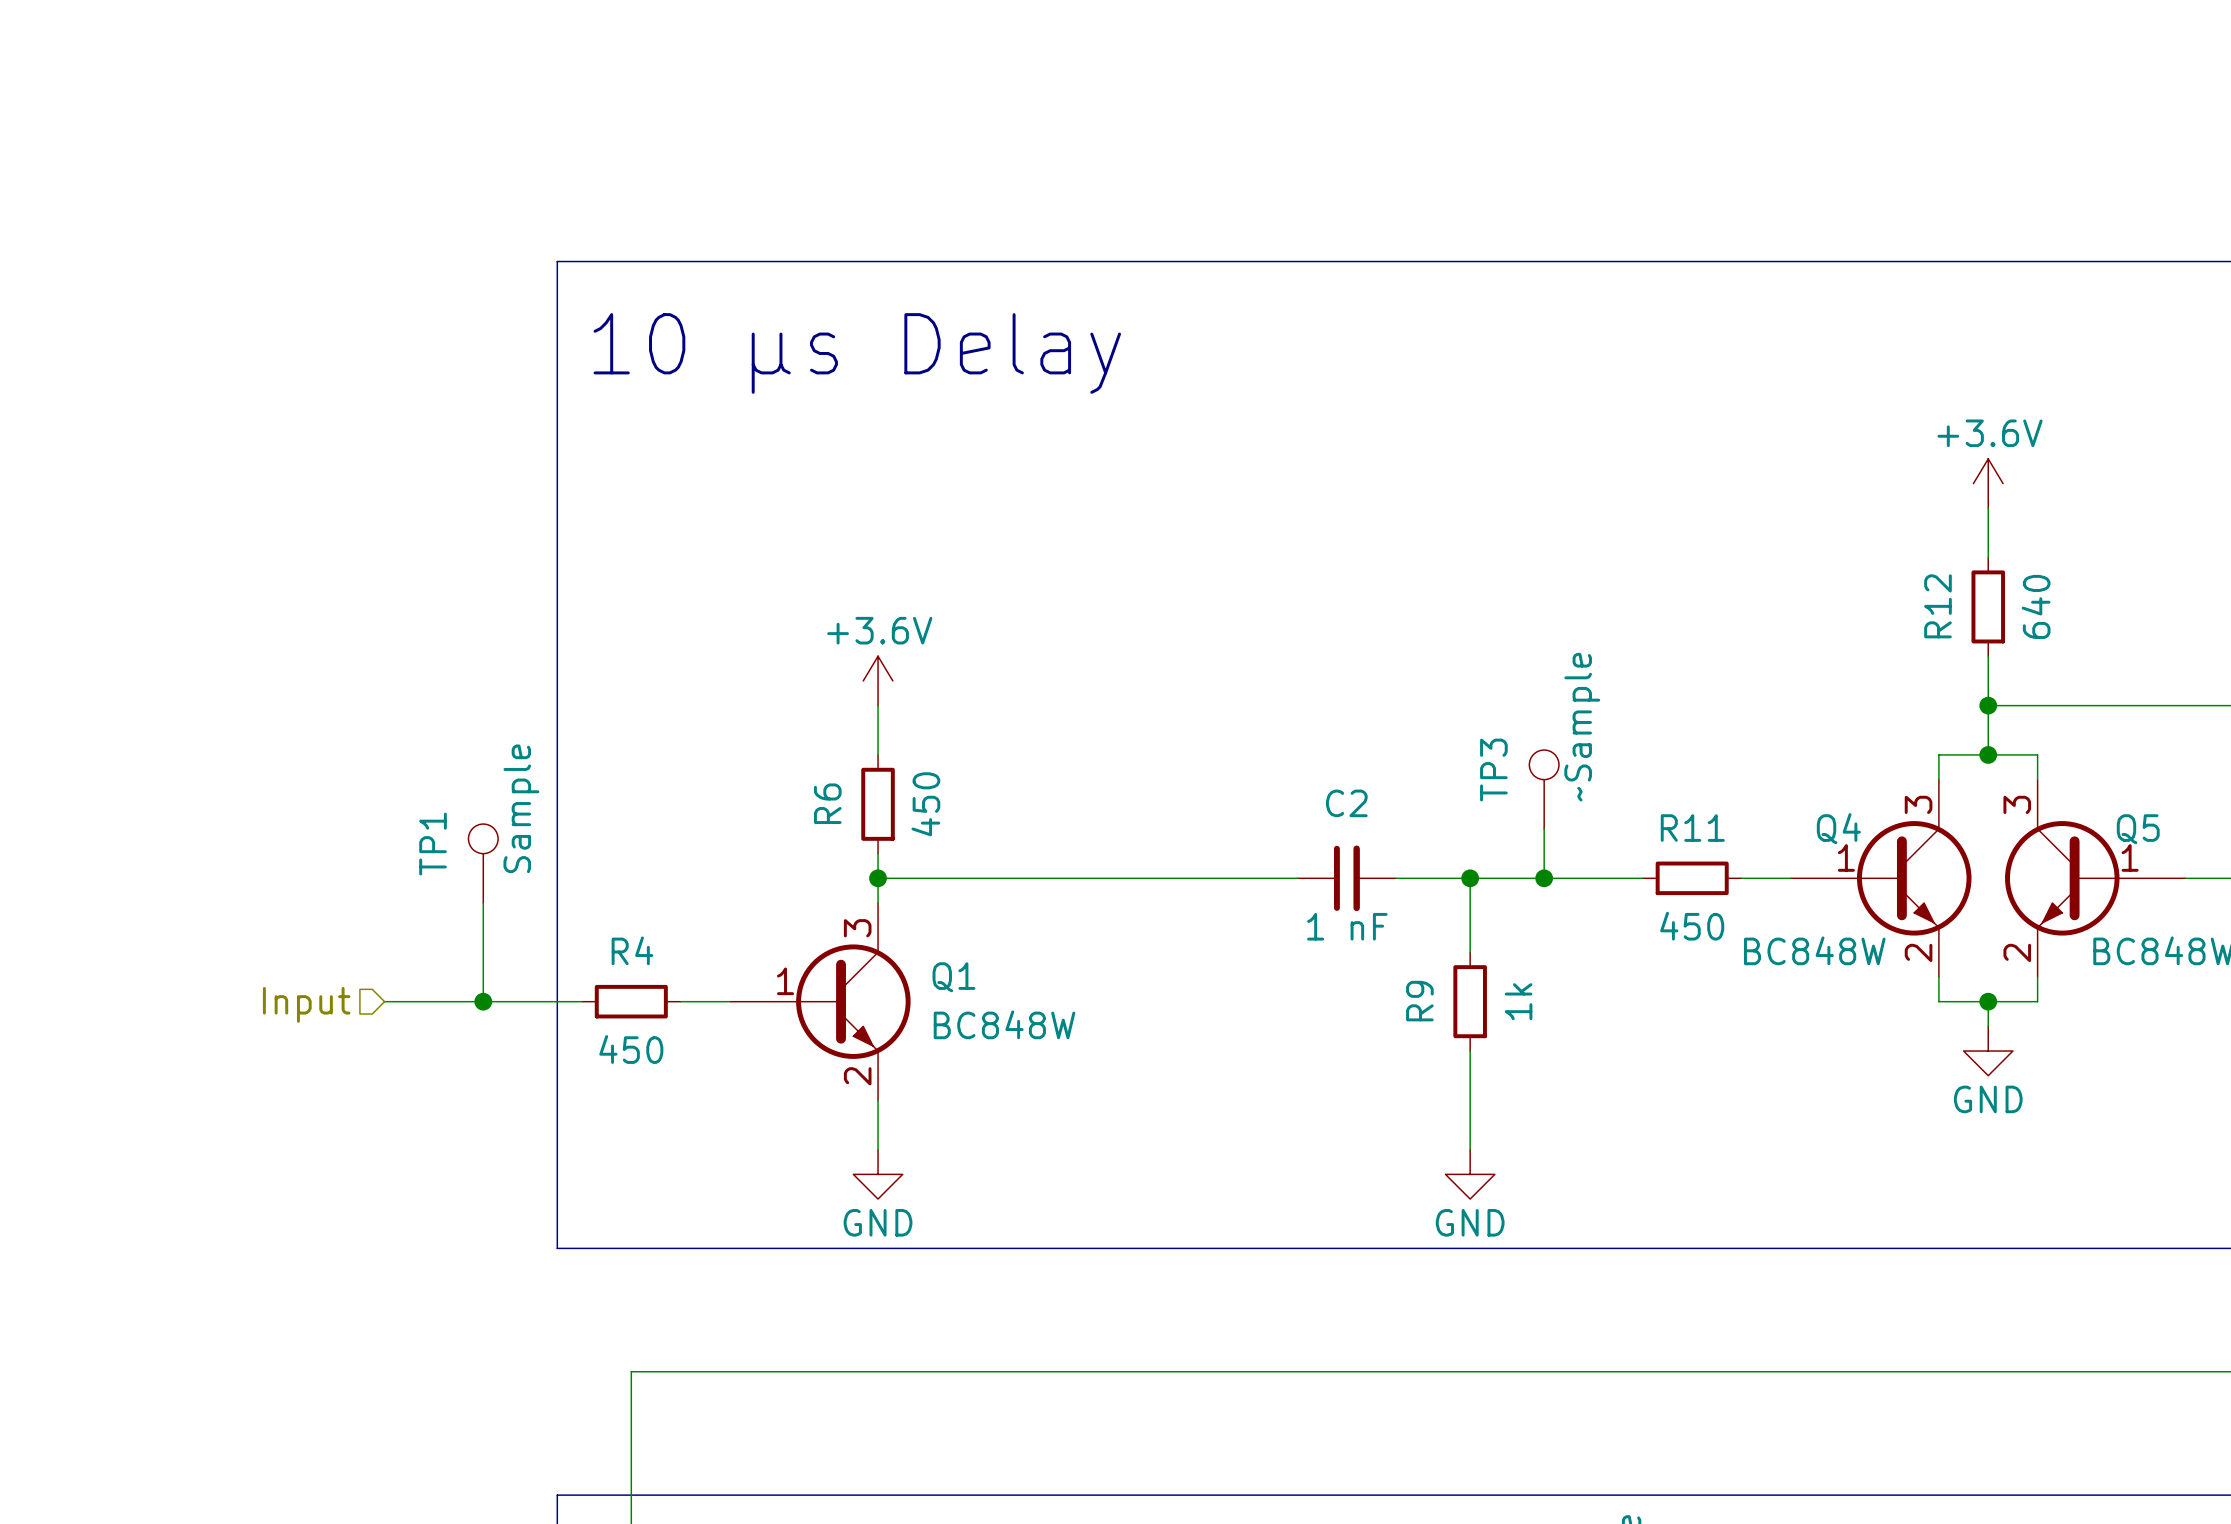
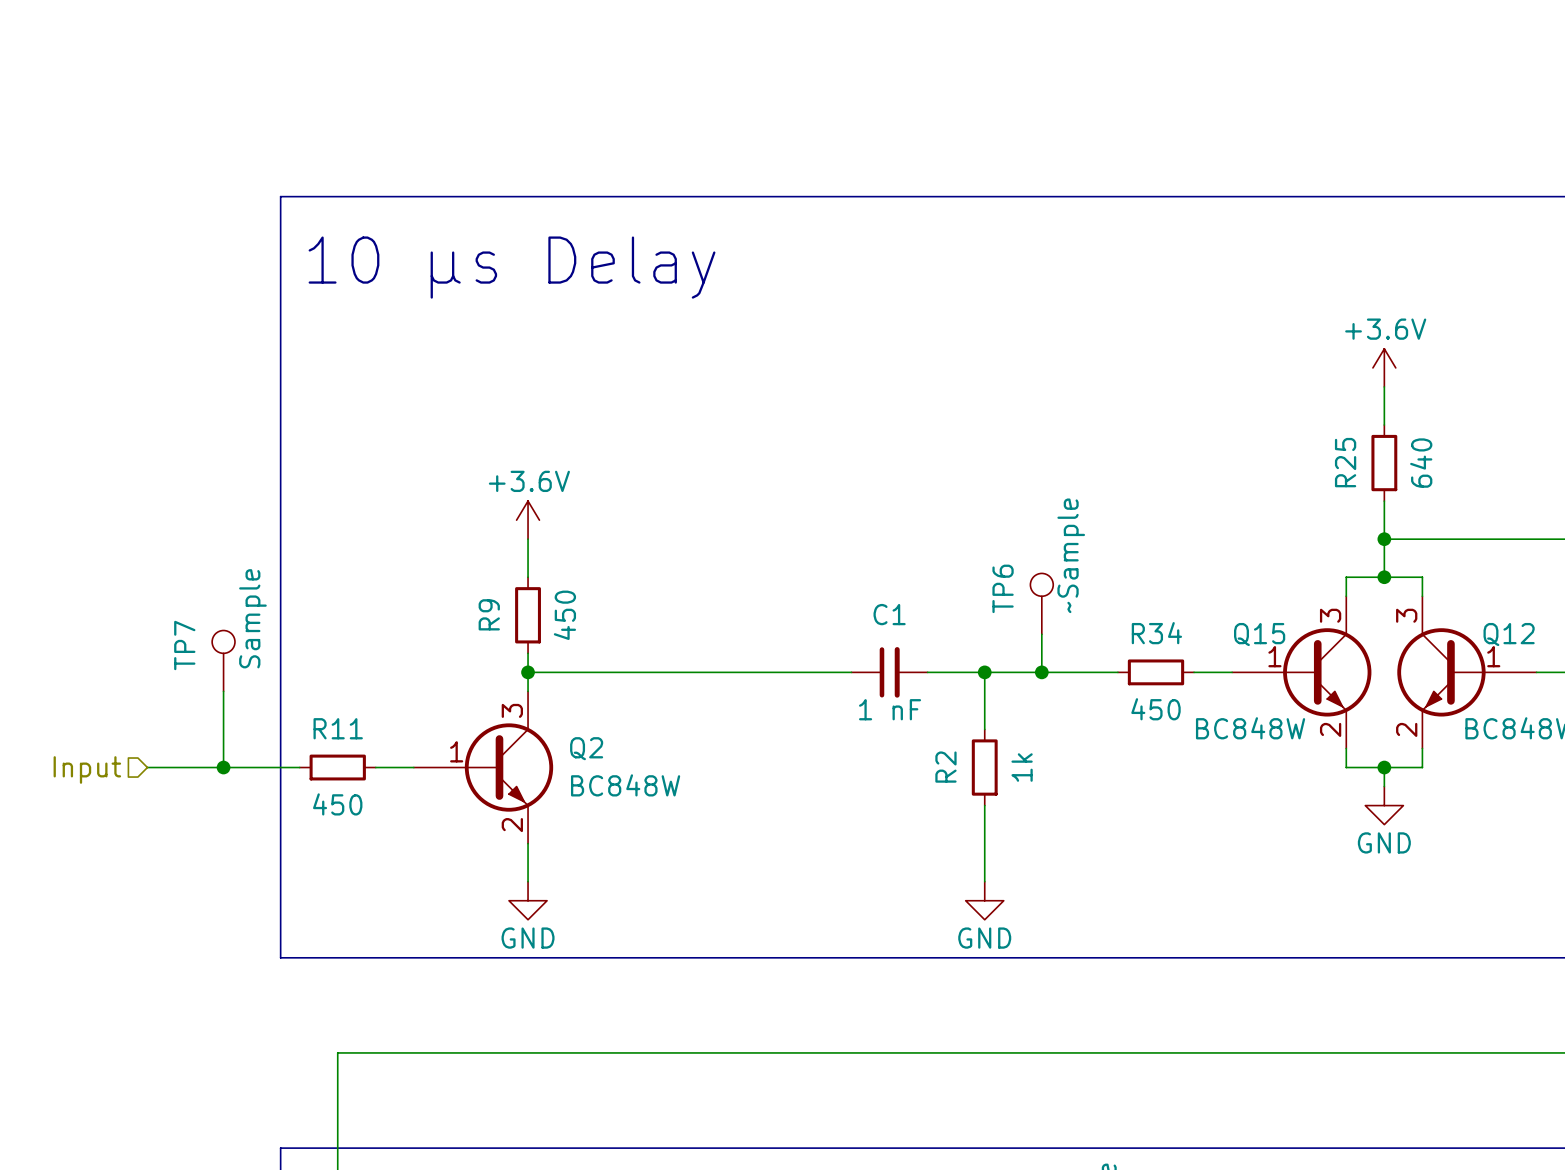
R12 name: R12 (1937, 606) -> R25 (1345, 462)
TP3 name: TP3 (1493, 770) -> TP6 (1003, 588)
R6 name: R6 (827, 803) -> R9 (489, 614)
C2 name: C2 (1346, 803) -> C1 (889, 614)
R11 name: R11 (1692, 828) -> R34 (1156, 633)
Q4 name: Q4 (1838, 828) -> Q15 (1259, 634)
Q5 name: Q5 (2138, 829) -> Q12 (1509, 634)
TP1 name: TP1 (433, 844) -> TP7 (184, 645)
R4 name: R4 (632, 950) -> R11 (338, 728)
Q1 name: Q1 (953, 977) -> Q2 (586, 748)
R9 name: R9 (1419, 1001) -> R2 (945, 767)

